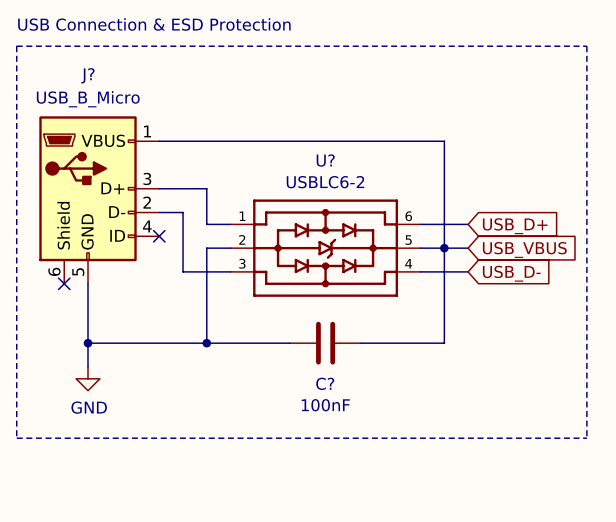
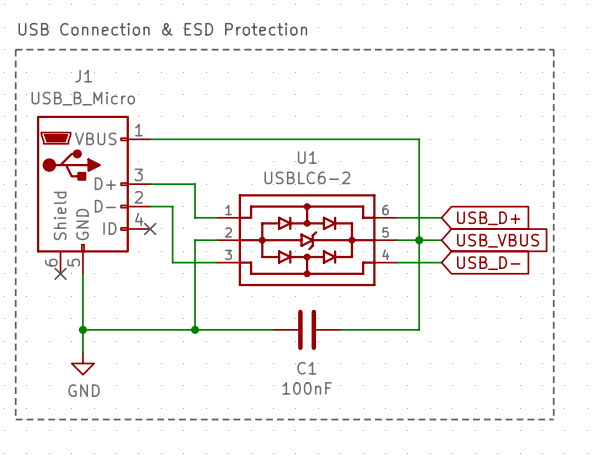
J? name: J? (87, 75) -> J1 (83, 76)
U? name: U? (325, 160) -> U1 (307, 157)
C? name: C? (325, 383) -> C1 (306, 368)

